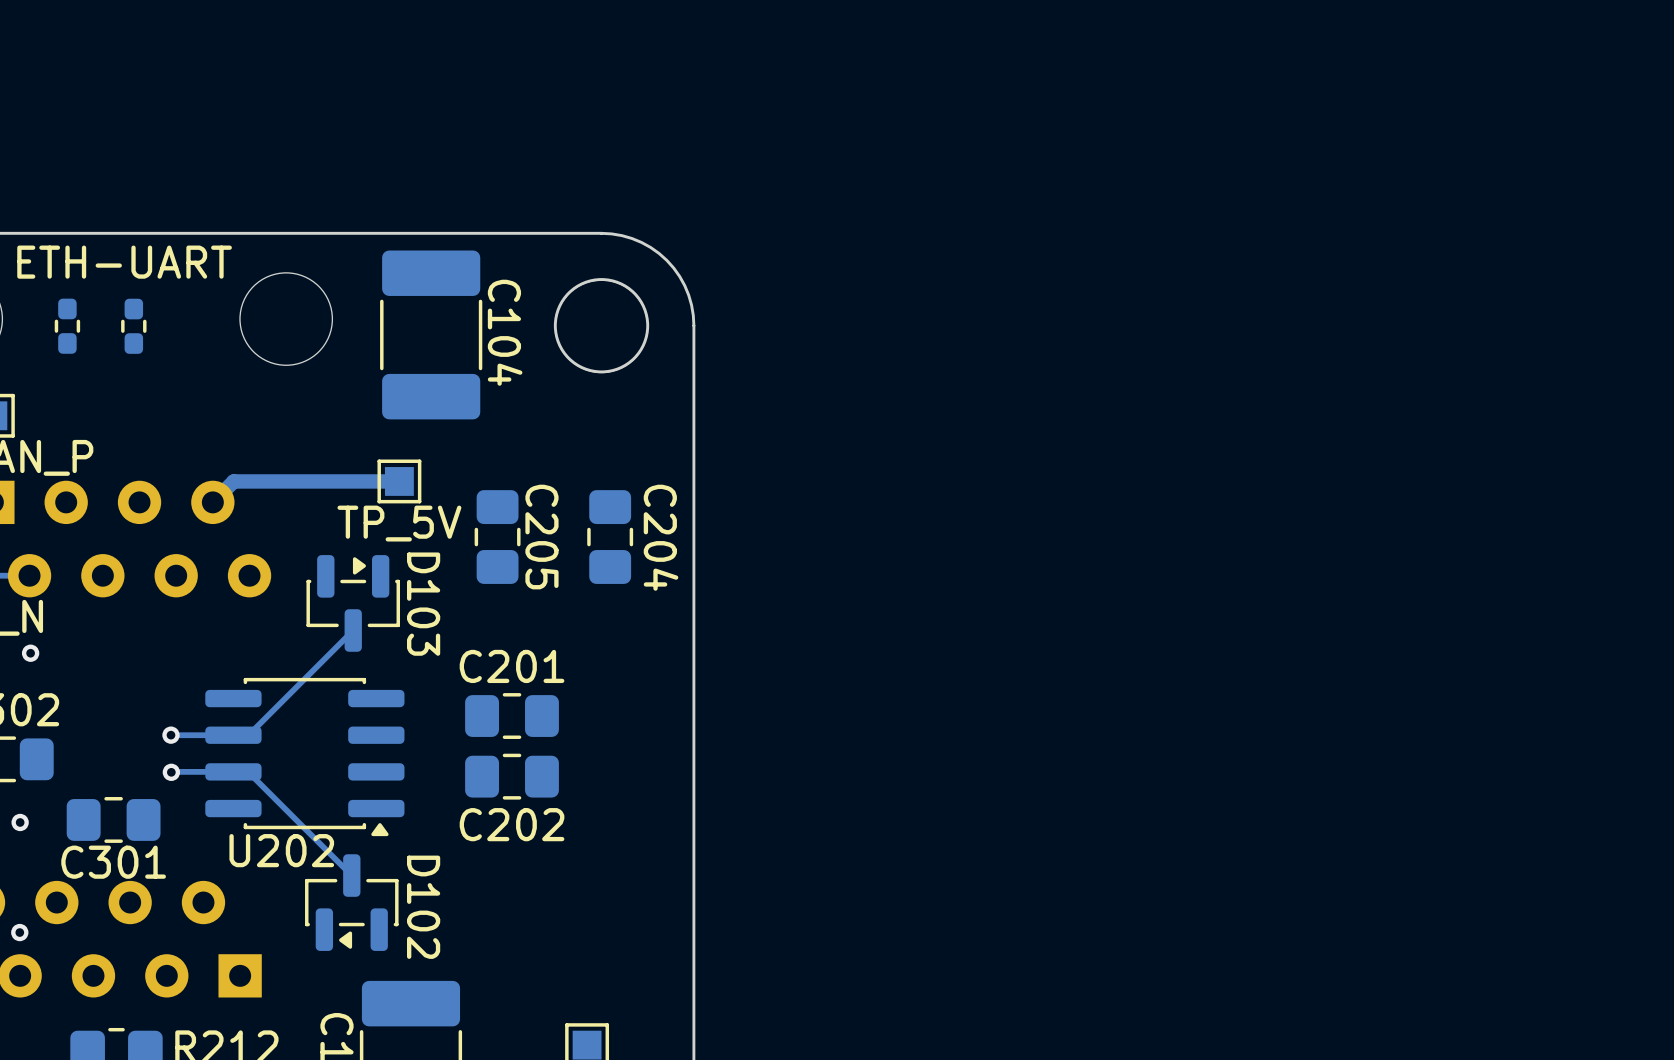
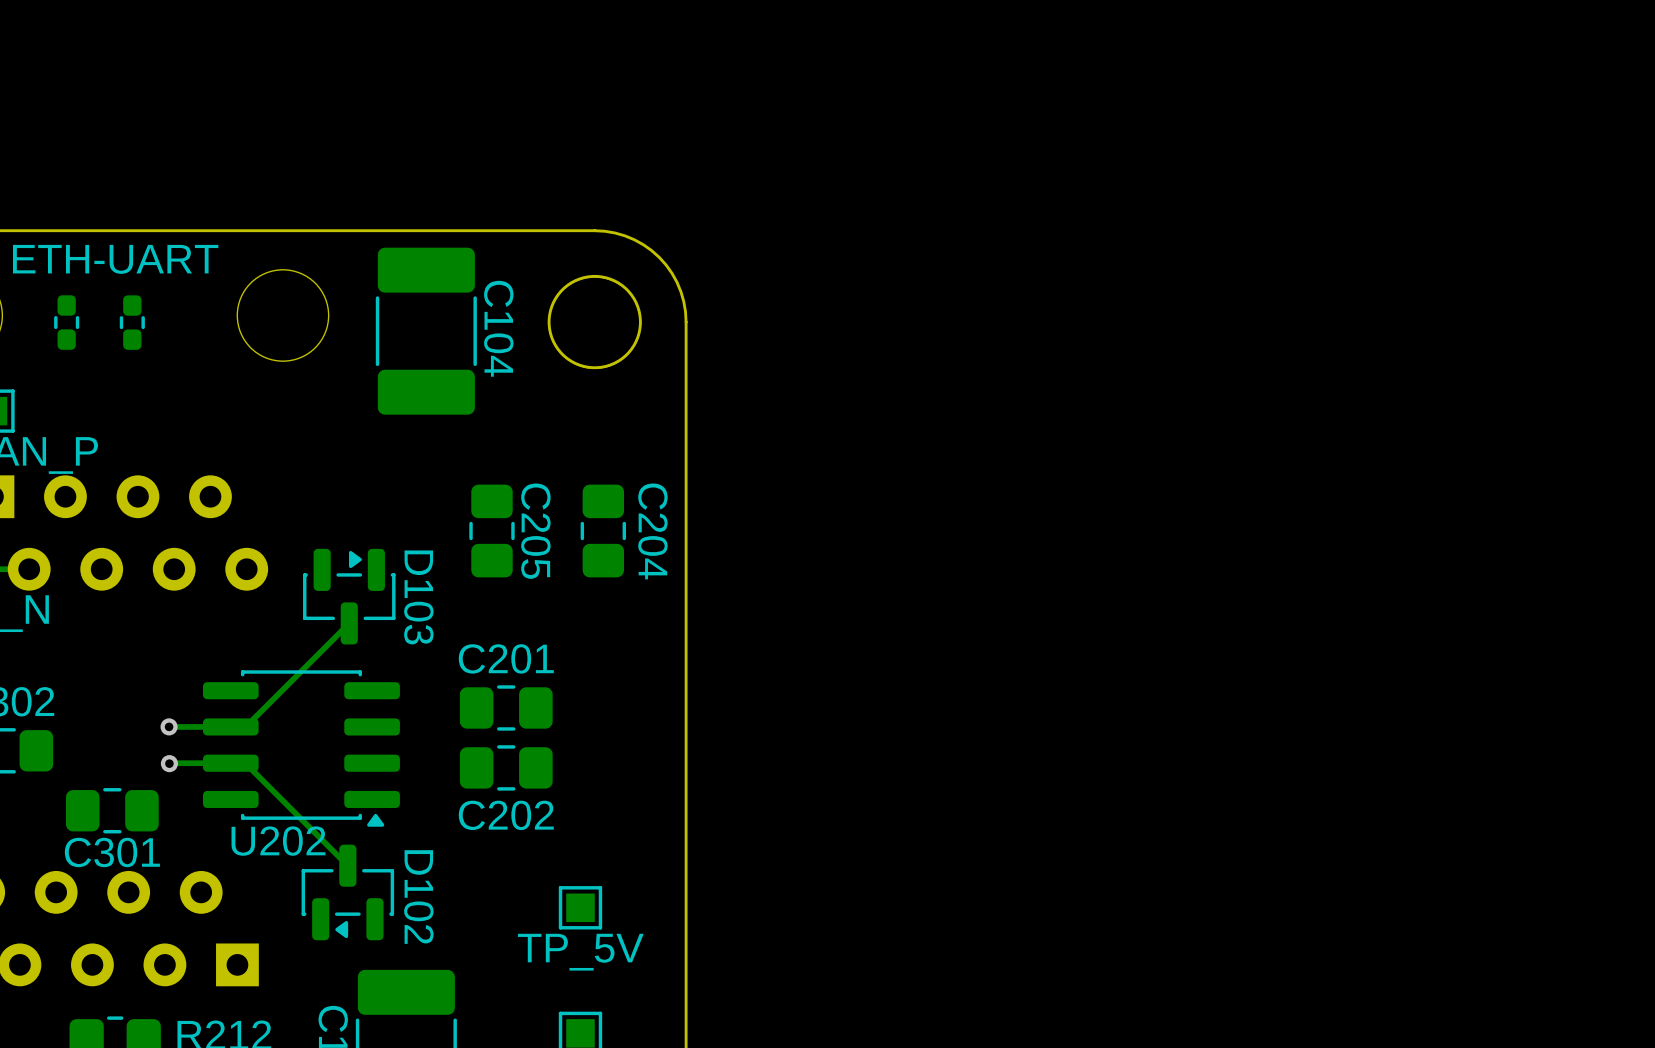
track: (399, 481) (233, 481) (212, 502) -> none
TP_5V position: (399, 481) -> (580, 907)
via: (30, 653) -> none
via: (20, 822) -> none
via: (19, 932) -> none

